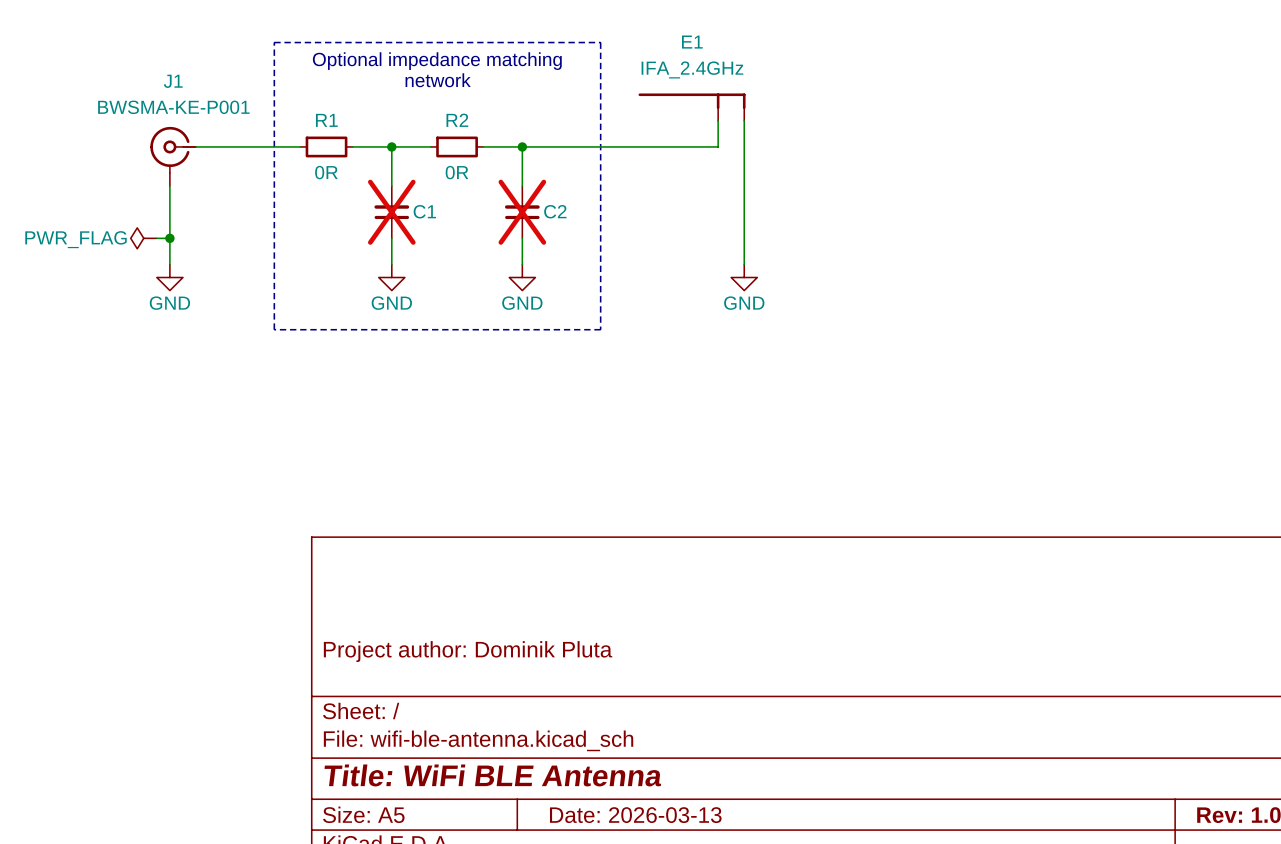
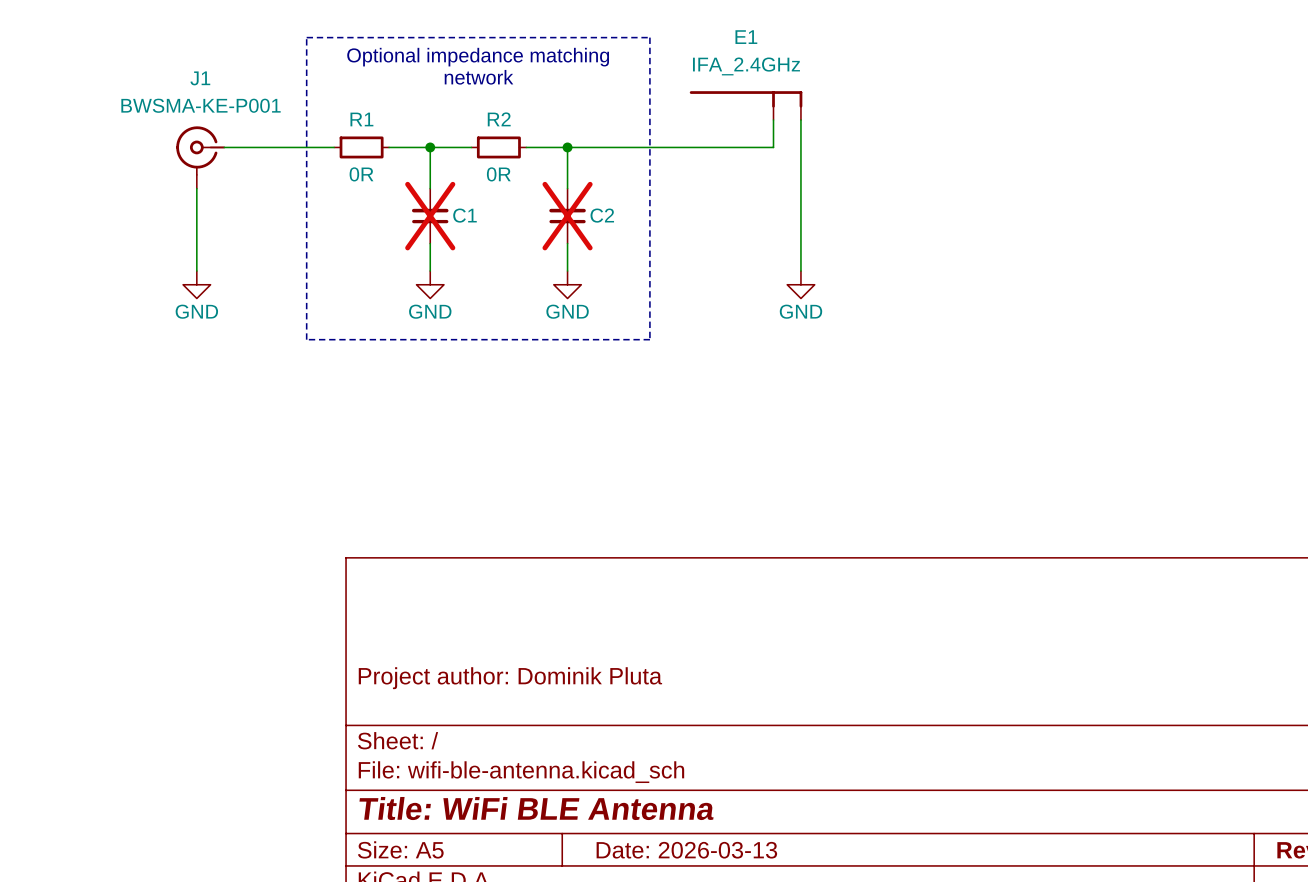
power symbol: PWR_FLAG (143, 238) -> none
wire: (156, 238) (169, 238) -> none
junction: (169, 238) -> none

